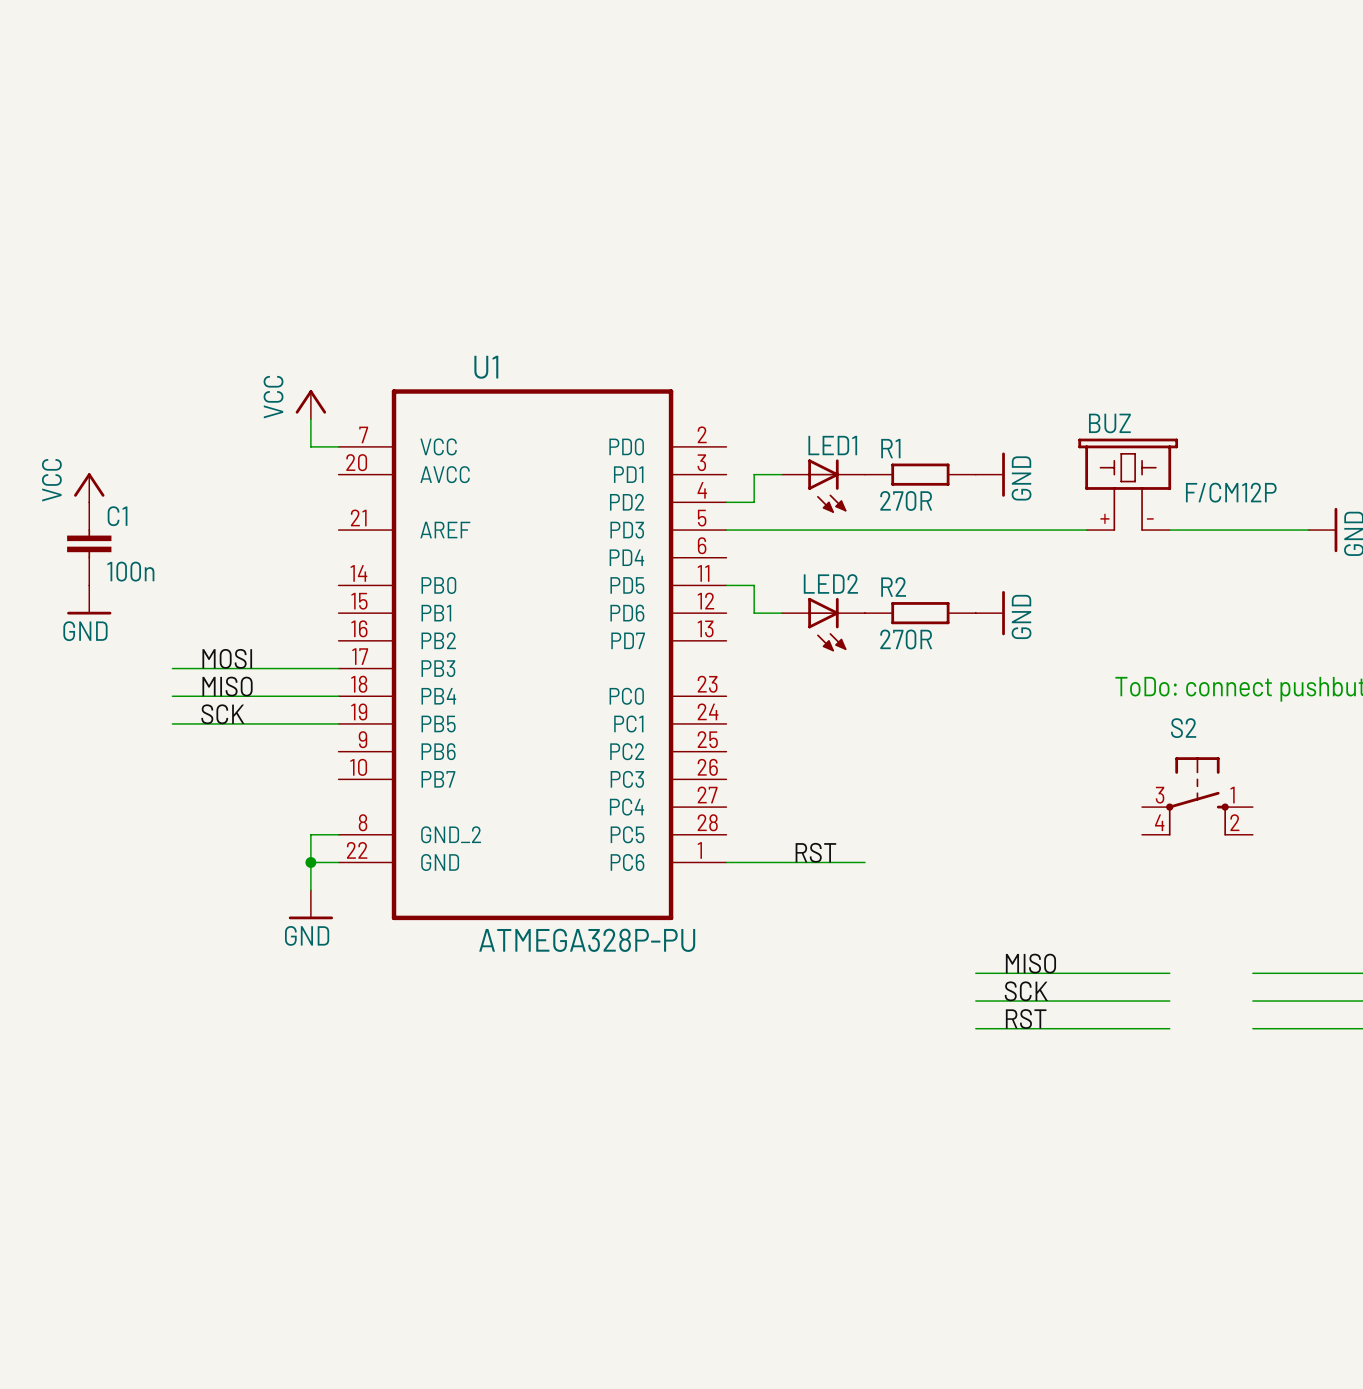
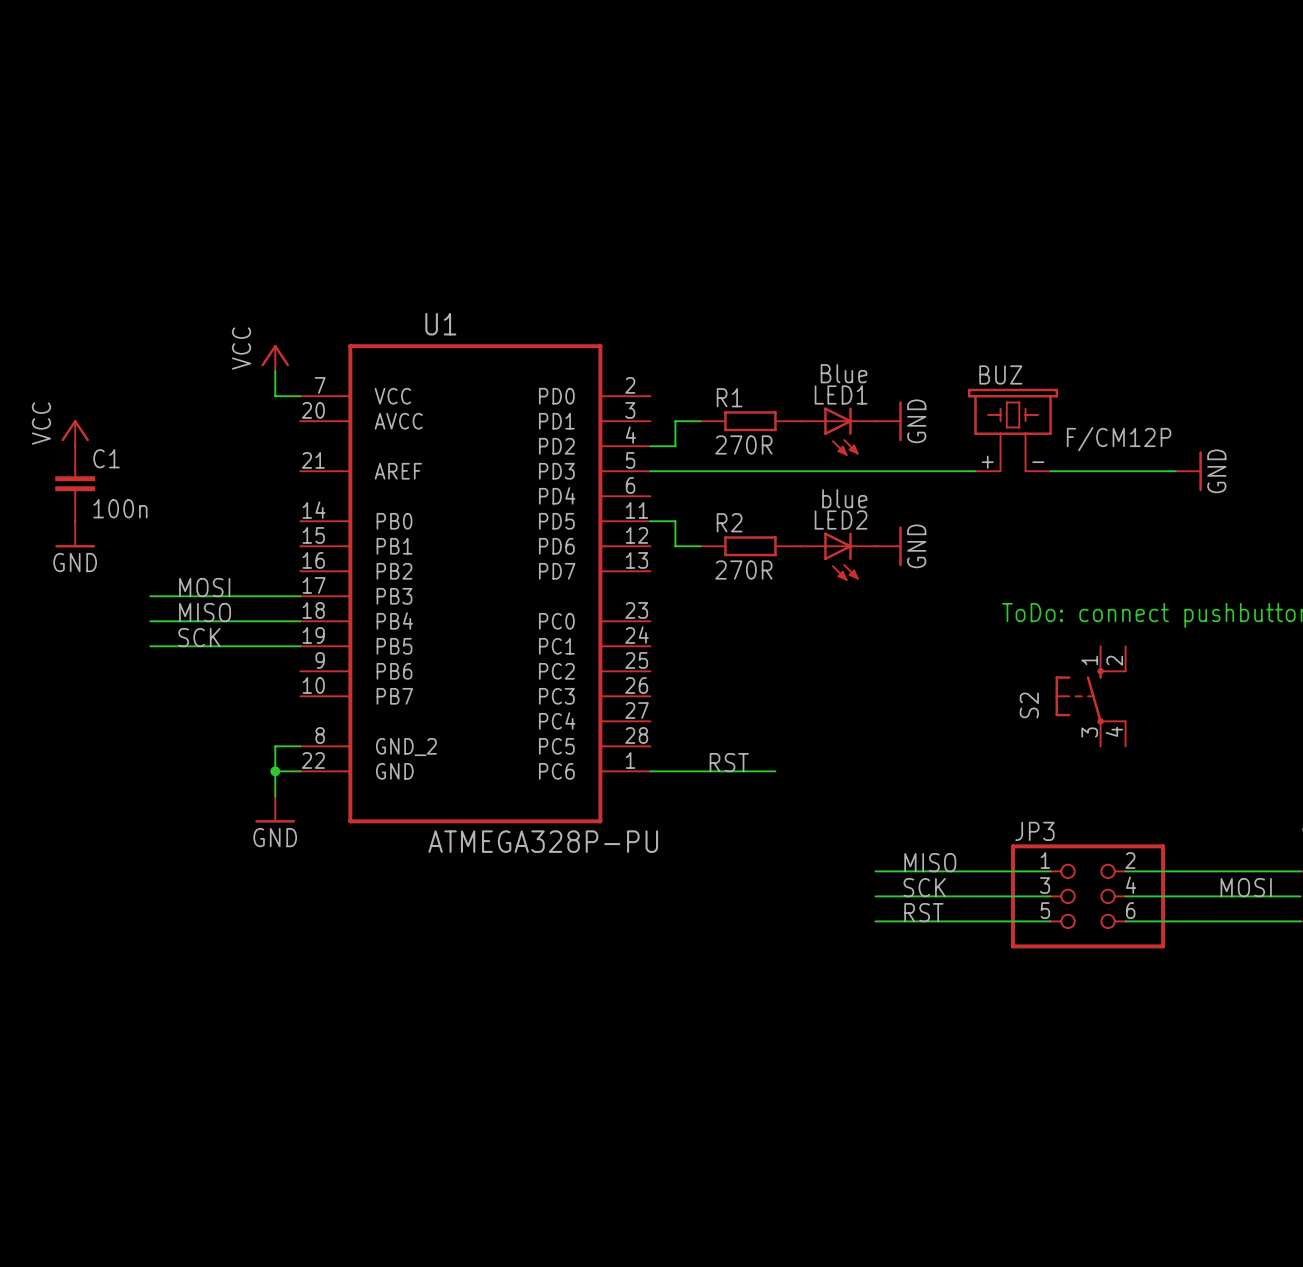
LED1 value: none -> Blue (844, 373)
R1 position: (920, 474) -> (750, 421)
LED1 position: (823, 486) -> (837, 431)
LED2 value: none -> blue (844, 498)
R2 position: (920, 613) -> (750, 546)
LED2 position: (823, 624) -> (837, 556)
S2 rotation: 0° (1197, 796) -> 90° counterclockwise (1090, 696)
JP3: none -> (1088, 896)

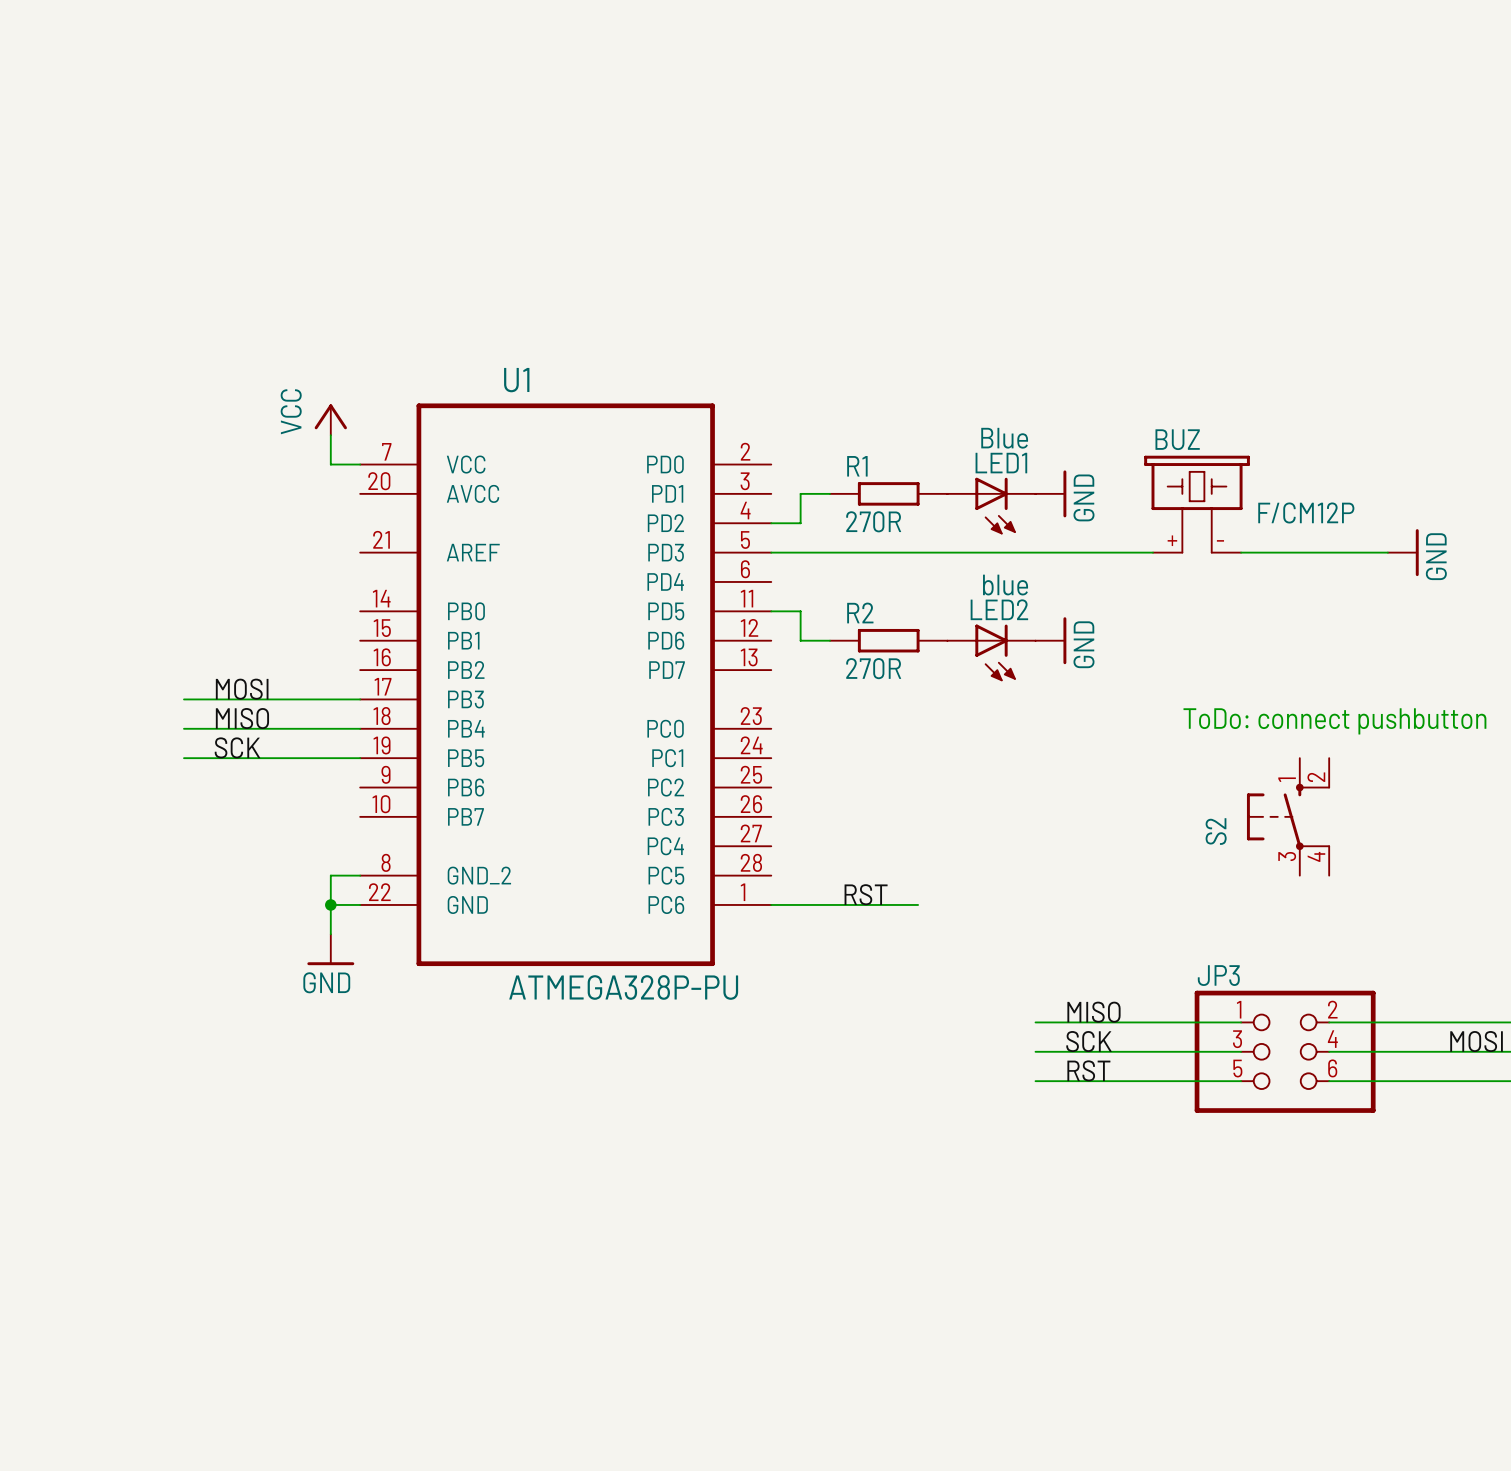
power symbol: VCC (75, 433) -> none
C1: 100n (75, 483) -> none
power symbol: GND (75, 534) -> none

